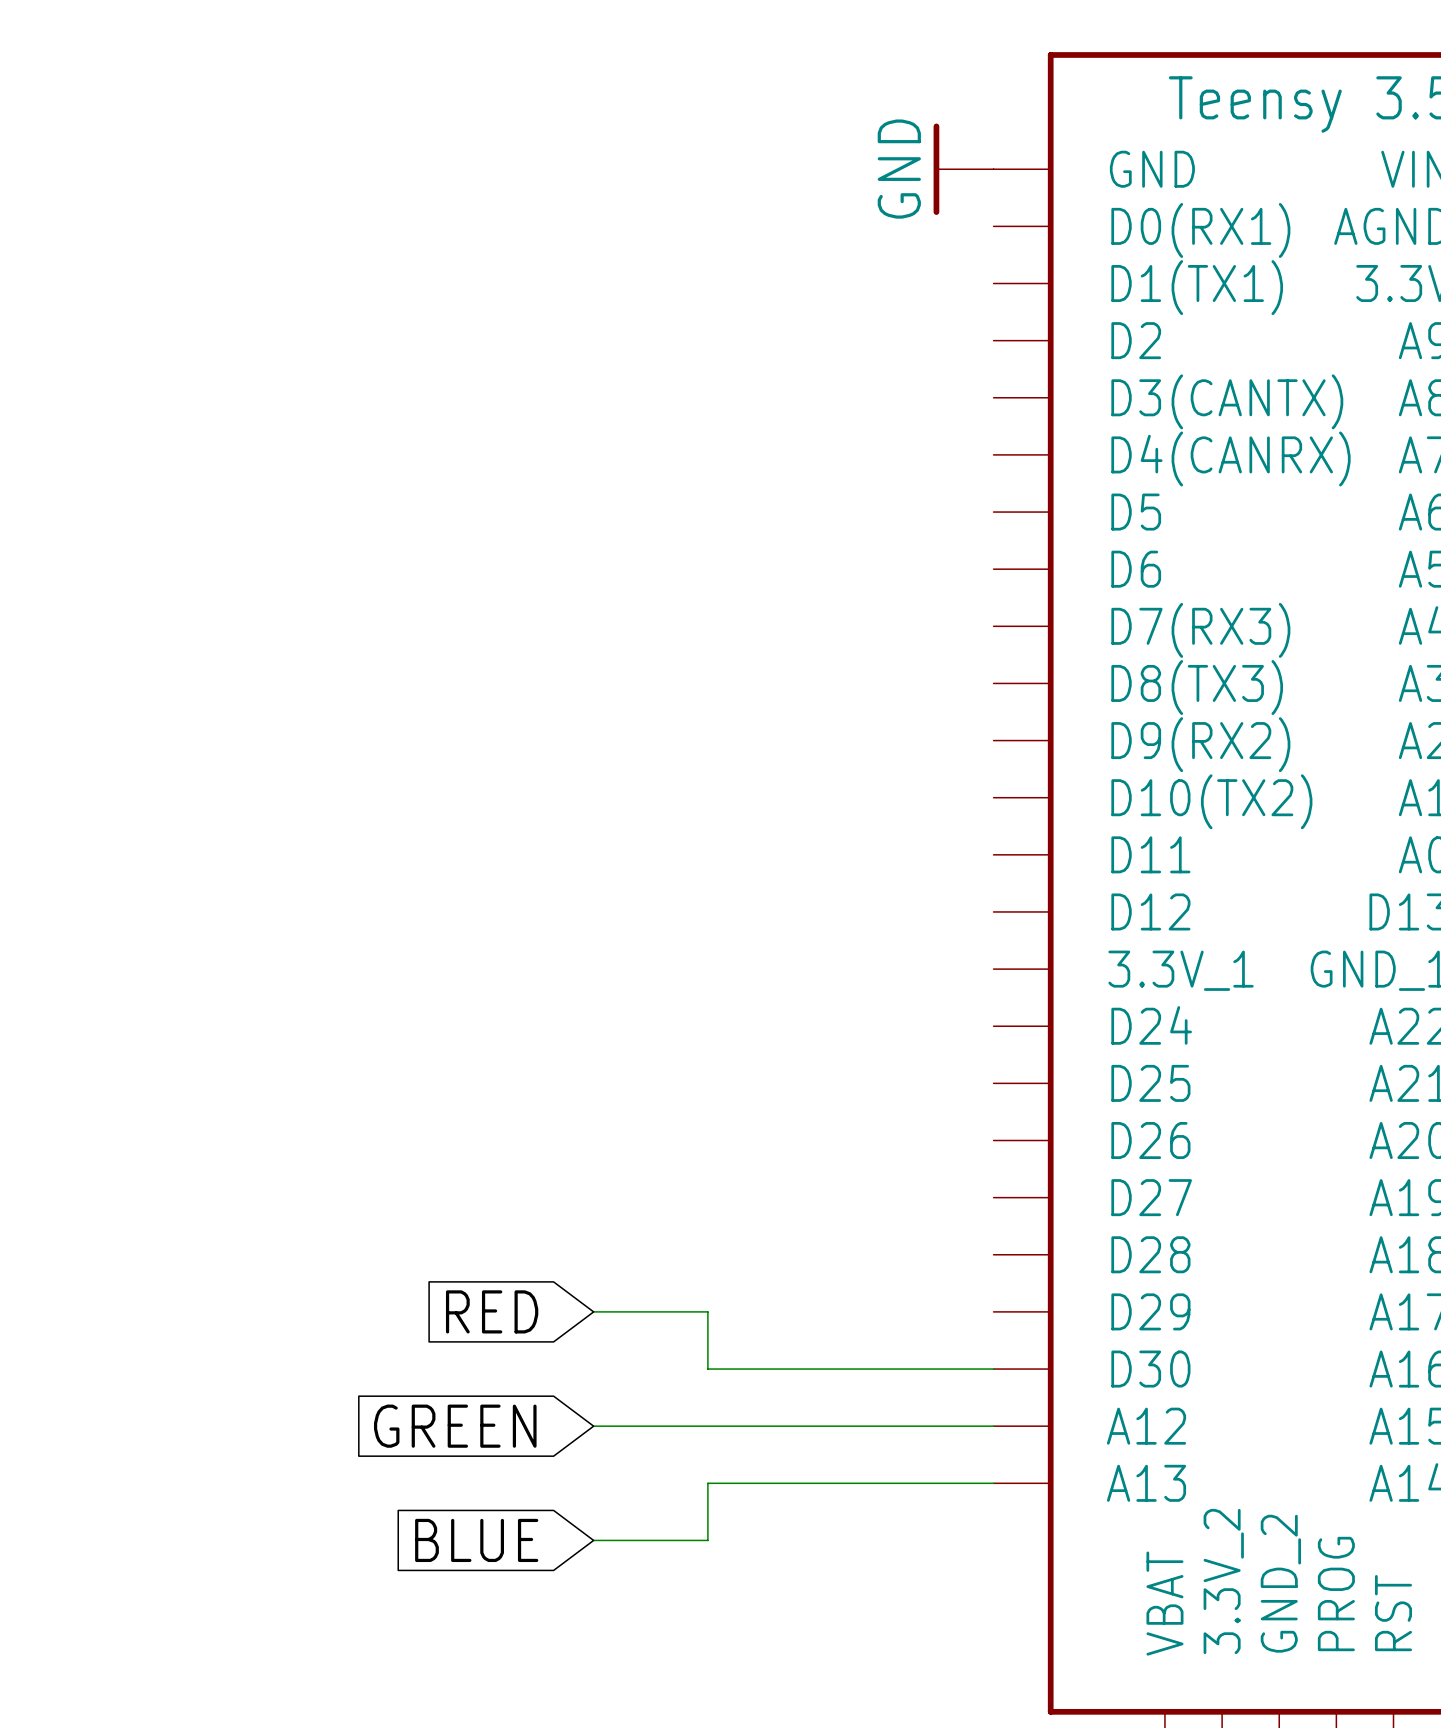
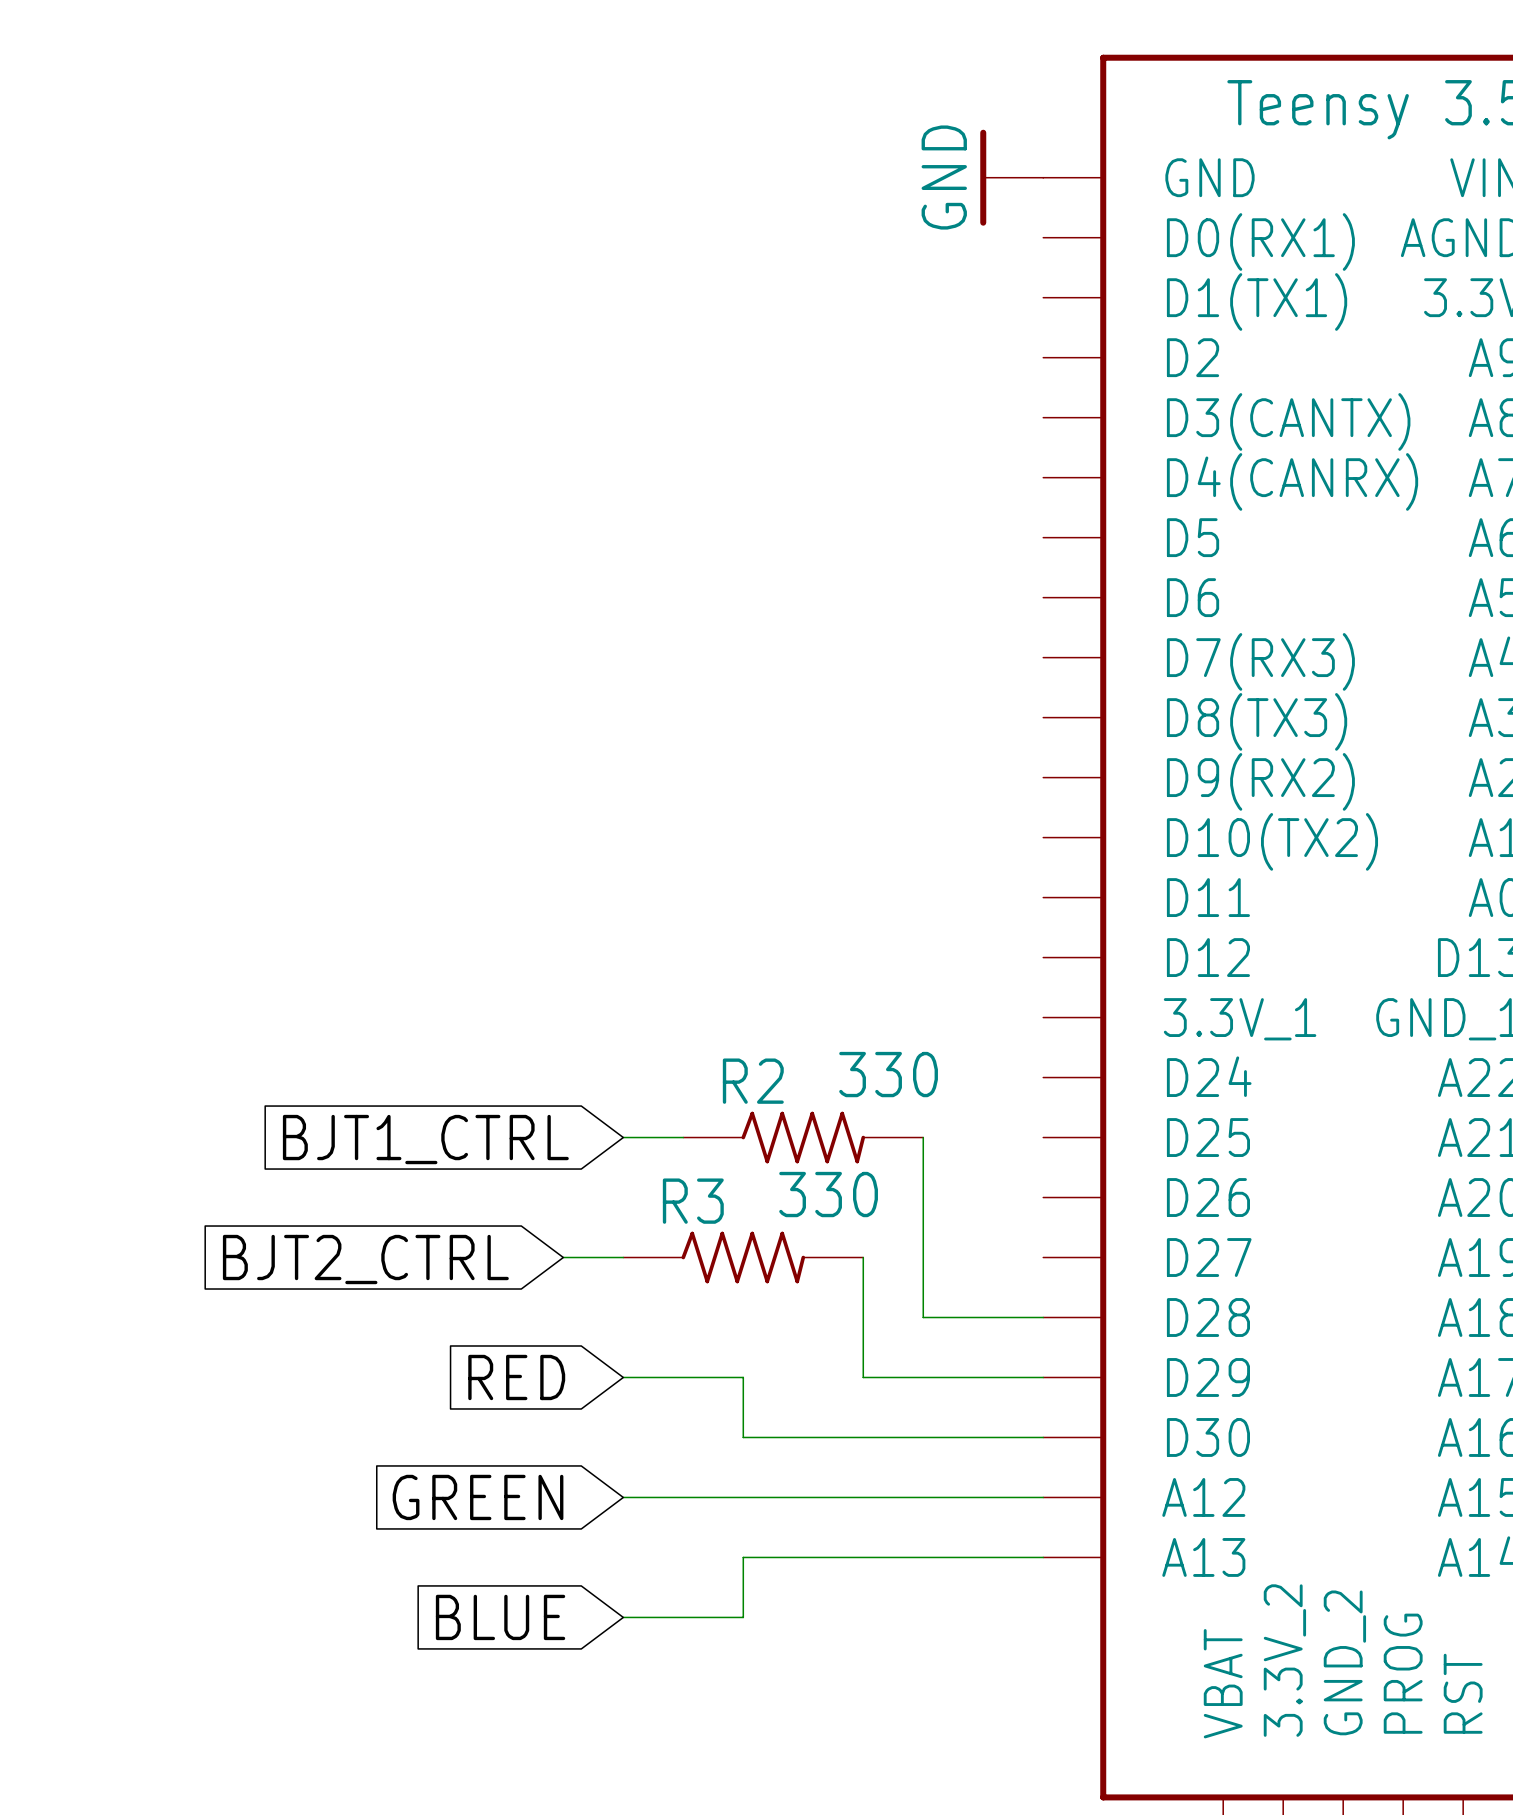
wire: none -> (623, 1137) (683, 1137)
R2: none -> 330 (803, 1137)
wire: none -> (923, 1137) (923, 1317) (1043, 1317)
global label: none -> BJT1_CTRL (425, 1139)
wire: none -> (563, 1257) (623, 1257)
R3: none -> 330 (743, 1257)
wire: none -> (863, 1257) (863, 1377) (1043, 1377)
global label: none -> BJT2_CTRL (365, 1259)

